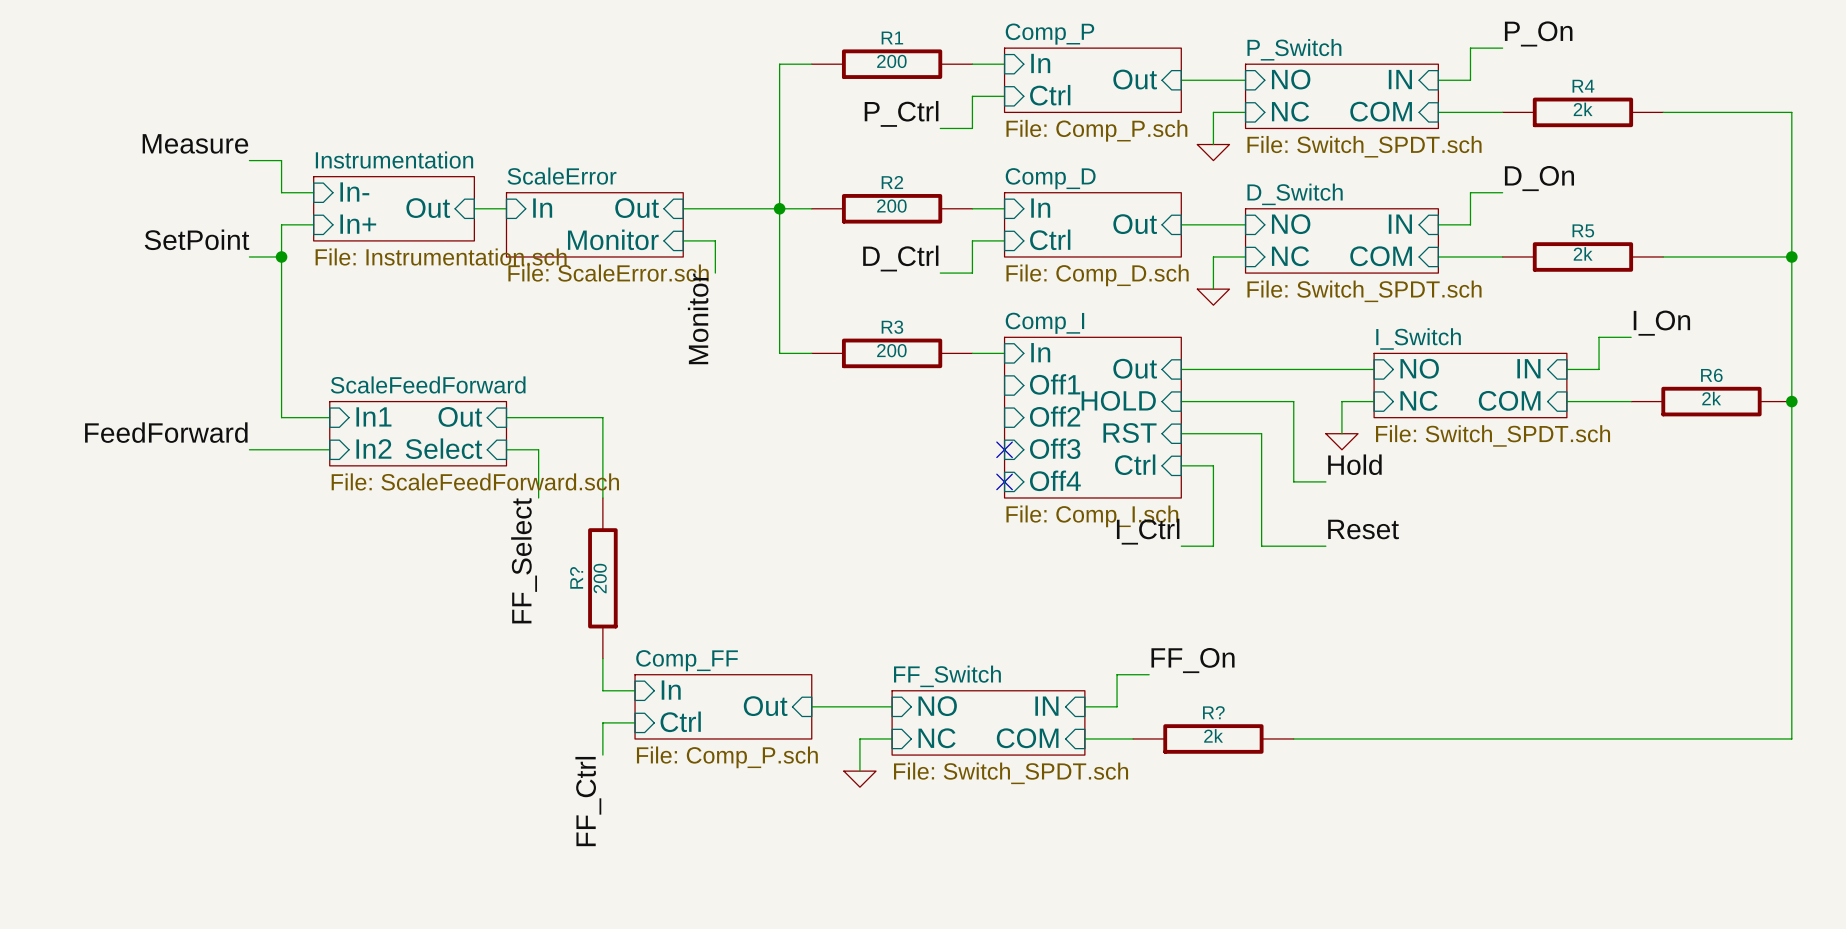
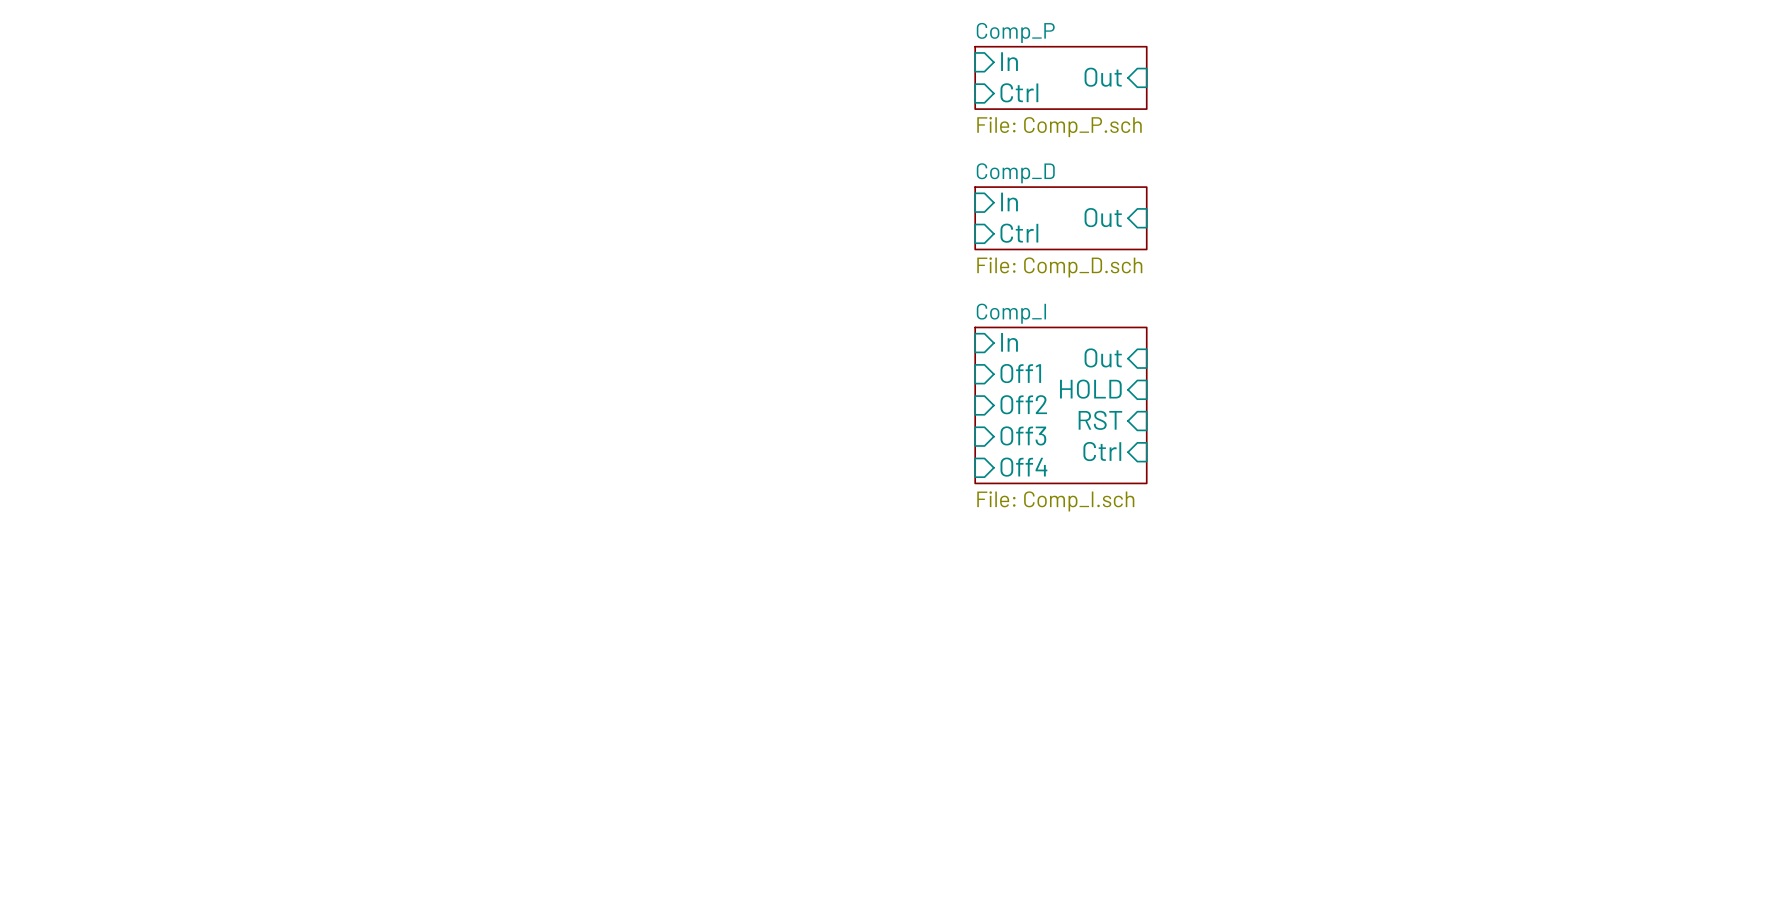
label: P_On (1538, 33) -> none
wire: (1502, 48) (1470, 48) (1470, 80) (1438, 80) -> none
wire: (811, 64) (779, 64) (779, 353) (811, 353) -> none
R1: 200 (892, 64) -> none
wire: (972, 64) (1004, 64) -> none
sheet pin: NO (1291, 79) -> none
sheet pin: IN (1400, 79) -> none
wire: (1181, 80) (1245, 80) -> none
wire: (1004, 96) (972, 96) (972, 128) (940, 128) -> none
sheet P_Switch: File: Switch_SPDT.sch (1341, 96) -> none
sheet pin: NC (1290, 111) -> none
sheet pin: COM (1381, 111) -> none
wire: (1245, 112) (1213, 112) (1213, 144) -> none
wire: (1438, 112) (1502, 112) -> none
R4: 2k (1582, 112) -> none
wire: (1663, 112) (1791, 112) (1791, 738) (1293, 738) -> none
label: P_Ctrl (901, 113) -> none
label: Measure (195, 143) -> none
power symbol: (1213, 152) -> none
wire: (249, 160) (281, 160) (281, 192) (313, 192) -> none
label: D_On (1539, 178) -> none
sheet pin: In- (354, 192) -> none
wire: (1502, 192) (1470, 192) (1470, 224) (1438, 224) -> none
sheet Instrumentation: File: Instrumentation.sch (394, 208) -> none
sheet pin: Out (428, 208) -> none
wire: (474, 208) (506, 208) -> none
sheet pin: In (542, 208) -> none
sheet pin: Out (637, 208) -> none
wire: (683, 208) (811, 208) -> none
junction: (779, 208) -> none
R2: 200 (892, 208) -> none
wire: (972, 208) (1004, 208) -> none
wire: (313, 224) (281, 224) (281, 417) (329, 417) -> none
sheet pin: In+ (358, 224) -> none
sheet ScaleError: File: ScaleError.sch (594, 224) -> none
wire: (1181, 224) (1245, 224) -> none
sheet pin: NO (1291, 224) -> none
sheet pin: IN (1400, 224) -> none
label: SetPoint (196, 239) -> none
sheet pin: Monitor (613, 239) -> none
wire: (683, 240) (715, 240) (715, 273) -> none
wire: (1004, 240) (972, 240) (972, 273) (940, 273) -> none
sheet D_Switch: File: Switch_SPDT.sch (1341, 240) -> none
wire: (249, 256) (281, 256) -> none
junction: (281, 256) -> none
wire: (1245, 256) (1213, 256) (1213, 289) -> none
sheet pin: NC (1290, 256) -> none
sheet pin: COM (1381, 256) -> none
wire: (1438, 256) (1502, 256) -> none
R5: 2k (1582, 256) -> none
wire: (1663, 256) (1791, 256) -> none
junction: (1791, 256) -> none
label: D_Ctrl (900, 258) -> none
power symbol: (1213, 297) -> none
label: Monitor (698, 318) -> none
label: I_On (1661, 323) -> none
wire: (1631, 337) (1599, 337) (1599, 369) (1566, 369) -> none
R3: 200 (892, 353) -> none
wire: (972, 353) (1004, 353) -> none
sheet pin: NO (1419, 368) -> none
sheet pin: IN (1528, 368) -> none
wire: (1181, 369) (1374, 369) -> none
sheet I_Switch: File: Switch_SPDT.sch (1470, 385) -> none
sheet pin: NC (1419, 400) -> none
sheet pin: COM (1509, 400) -> none
wire: (1181, 401) (1293, 401) (1293, 481) (1325, 481) -> none
wire: (1374, 401) (1341, 401) (1341, 433) -> none
wire: (1566, 401) (1631, 401) -> none
R6: 2k (1711, 401) -> none
junction: (1791, 401) -> none
sheet pin: In1 (373, 416) -> none
sheet pin: Out (460, 416) -> none
wire: (506, 417) (602, 417) (602, 497) -> none
label: FeedForward (166, 432) -> none
sheet ScaleFeedForward: File: ScaleFeedForward.sch (418, 433) -> none
wire: (1181, 433) (1261, 433) (1261, 546) (1325, 546) -> none
power symbol: (1341, 441) -> none
sheet pin: In2 (373, 448) -> none
sheet pin: Select (443, 448) -> none
wire: (249, 449) (329, 449) -> none
wire: (506, 449) (538, 449) (538, 497) -> none
no-connect mark: (1004, 449) -> none
label: Hold (1354, 464) -> none
wire: (1181, 465) (1213, 465) (1213, 546) (1181, 546) -> none
no-connect mark: (1004, 481) -> none
label: Reset (1363, 529) -> none
label: I_Ctrl (1148, 531) -> none
label: FF_Select (524, 560) -> none
R?: 200 (602, 578) -> none
wire: (602, 658) (602, 690) (635, 690) -> none
label: FF_On (1193, 660) -> none
wire: (1149, 674) (1117, 674) (1117, 706) (1084, 706) -> none
sheet pin: In (671, 690) -> none
sheet Comp_FF: File: Comp_P.sch (723, 706) -> none
sheet pin: Out (765, 706) -> none
wire: (811, 706) (892, 706) -> none
sheet pin: NO (937, 706) -> none
sheet pin: IN (1046, 706) -> none
sheet pin: Ctrl (680, 721) -> none
wire: (635, 722) (602, 722) (602, 755) -> none
sheet FF_Switch: File: Switch_SPDT.sch (988, 722) -> none
wire: (892, 738) (859, 738) (859, 771) -> none
sheet pin: NC (937, 738) -> none
sheet pin: COM (1027, 738) -> none
wire: (1084, 738) (1133, 738) -> none
R?: 2k (1213, 738) -> none
power symbol: (859, 779) -> none
label: FF_Ctrl (588, 801) -> none

